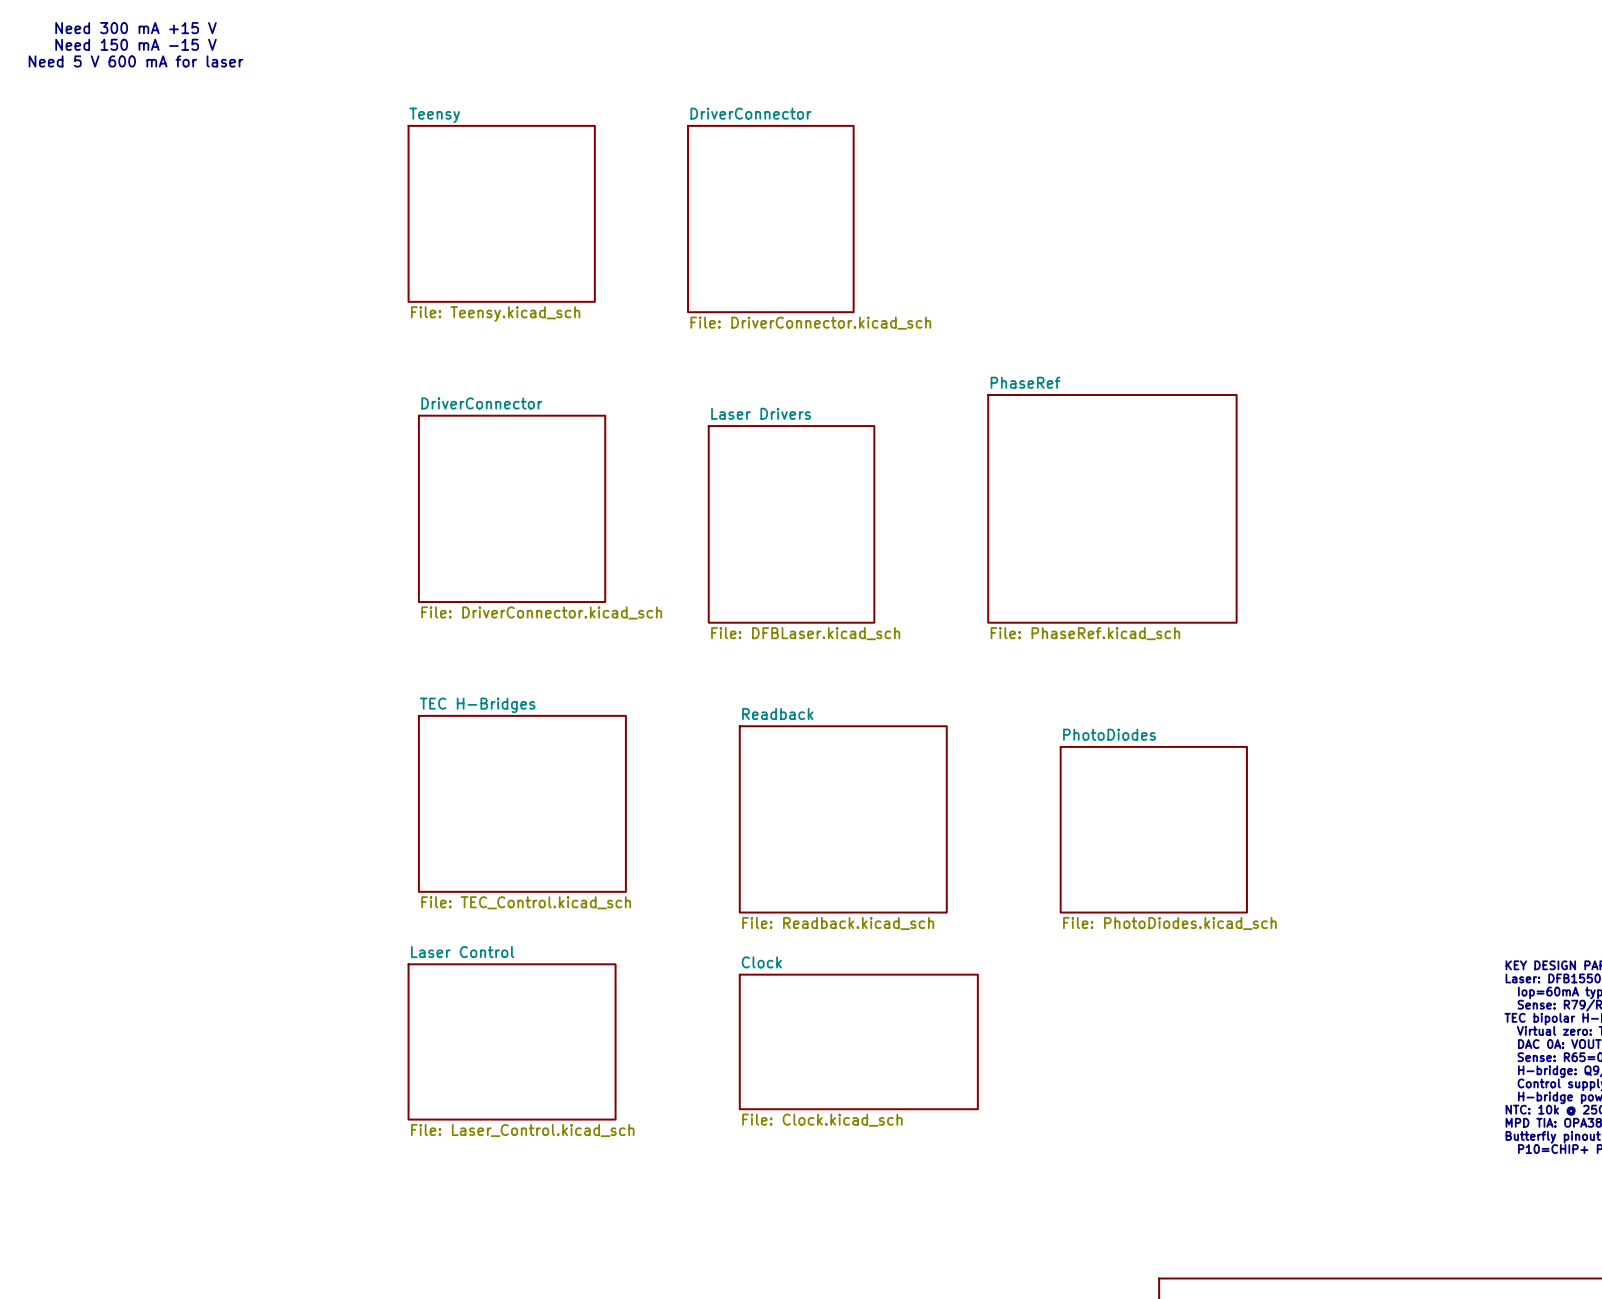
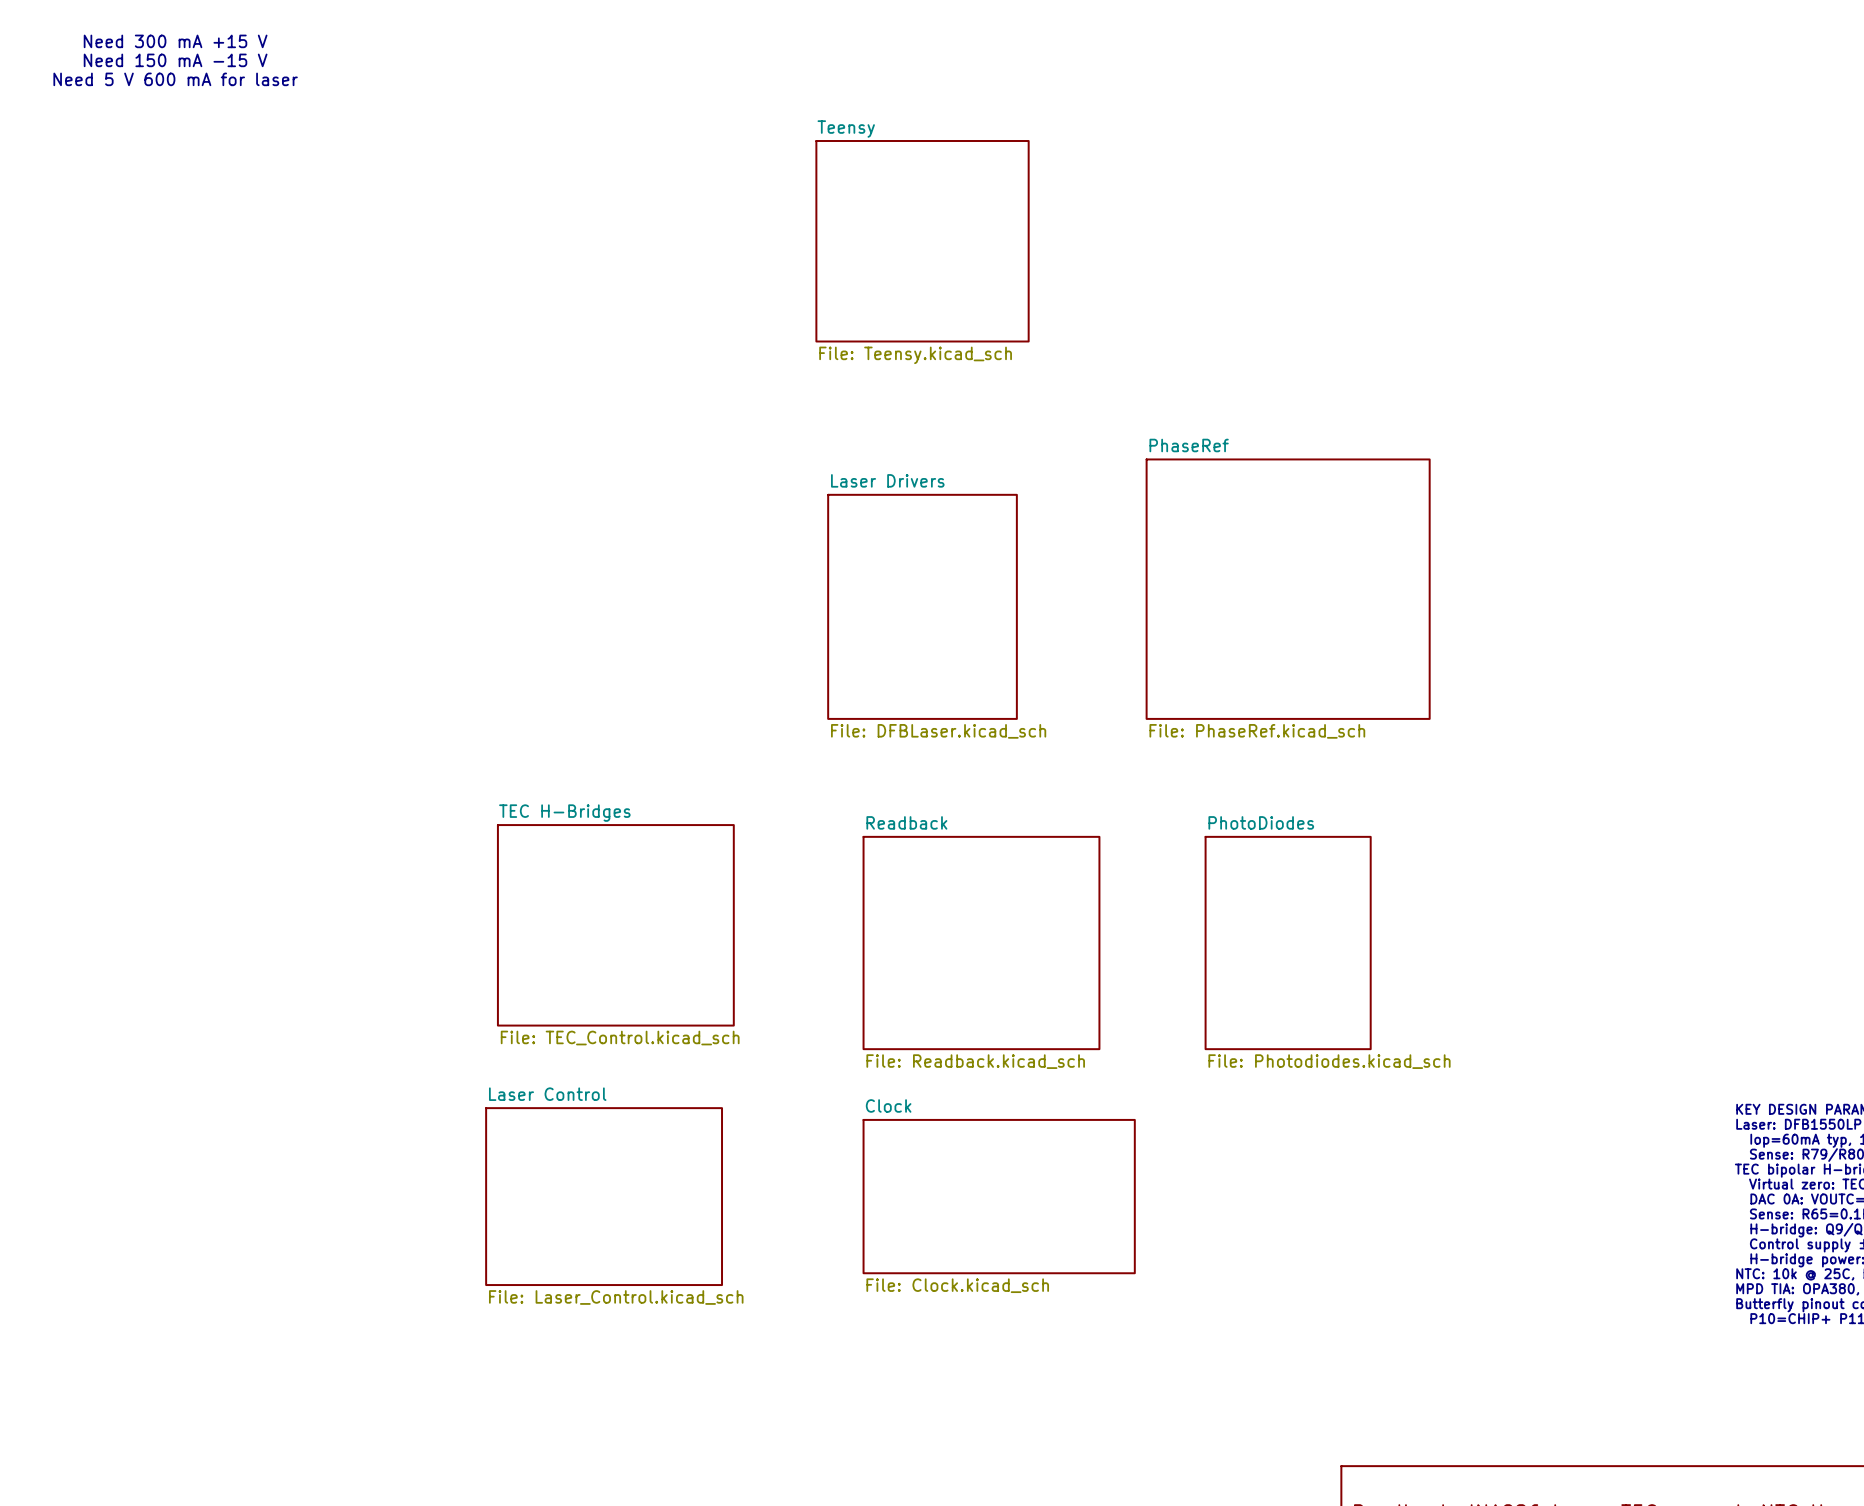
sheet Teensy: none -> File: Teensy.kicad_sch (922, 241)
sheet Teensy: File: Teensy.kicad_sch (501, 213) -> none
sheet DriverConnector: File: DriverConnector.kicad_sch (770, 219) -> none
sheet DriverConnector: File: DriverConnector.kicad_sch (512, 508) -> none
sheet PhotoDiodes: none -> File: Photodiodes.kicad_sch (1288, 943)
sheet PhotoDiodes: File: PhotoDiodes.kicad_sch (1153, 829) -> none

